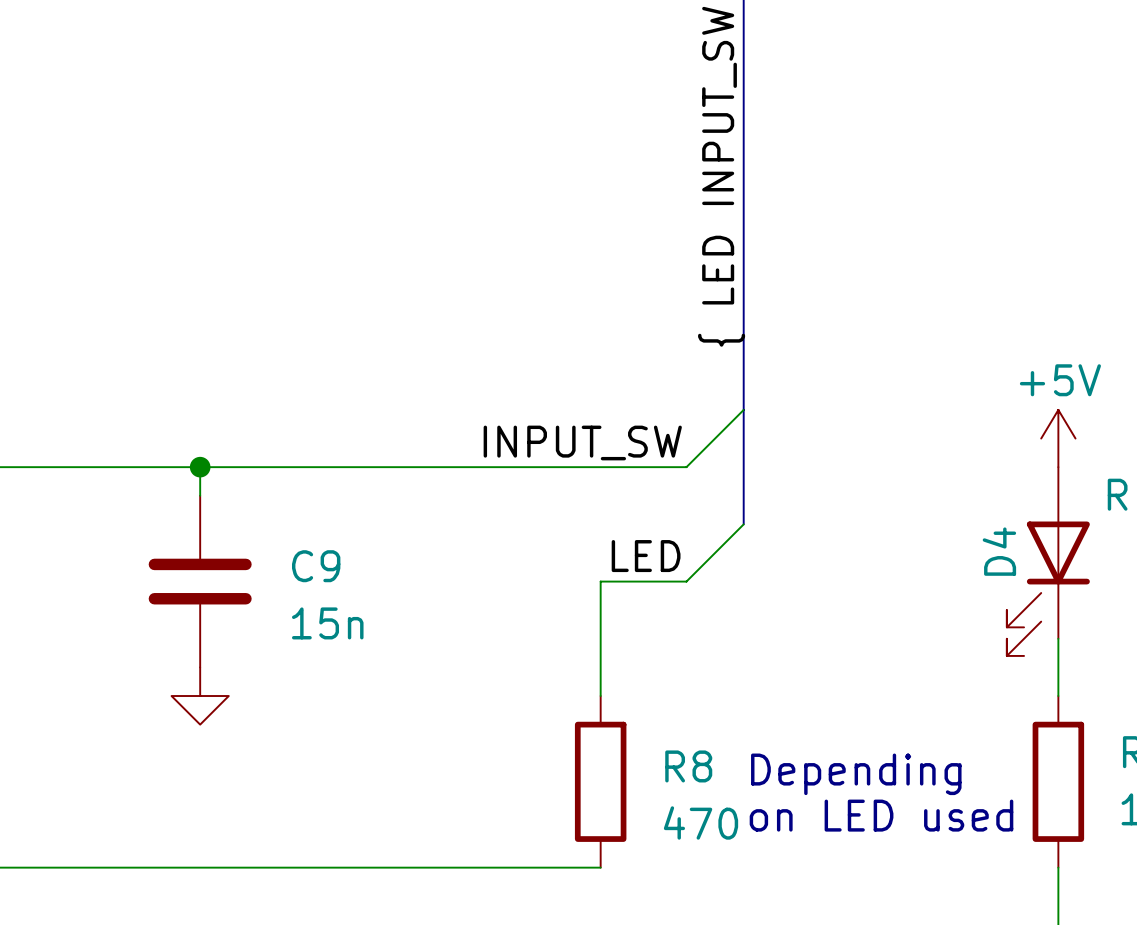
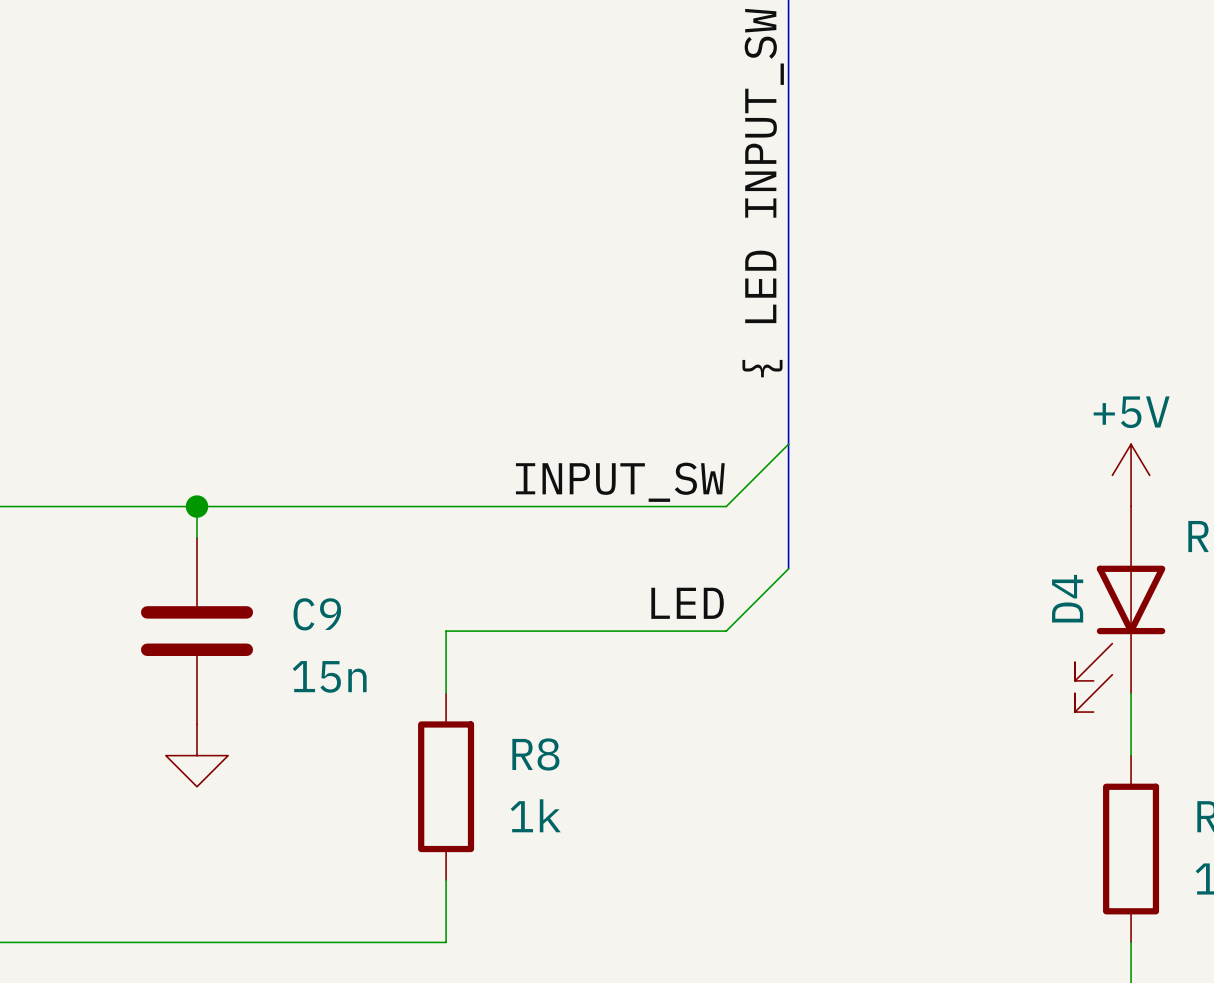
wire: (600, 581) (600, 696) -> (632, 631) (446, 631) (446, 693)
R8 name position: R8 (688, 766) -> R8 (535, 754)
text: Depending (856, 774) -> none
R8 position: (600, 781) -> (446, 786)
text: on LED used (881, 815) -> none
R8 value: 470 (701, 822) -> 1k (535, 815)
wire: (429, 867) (600, 867) -> (446, 942) (446, 880)

